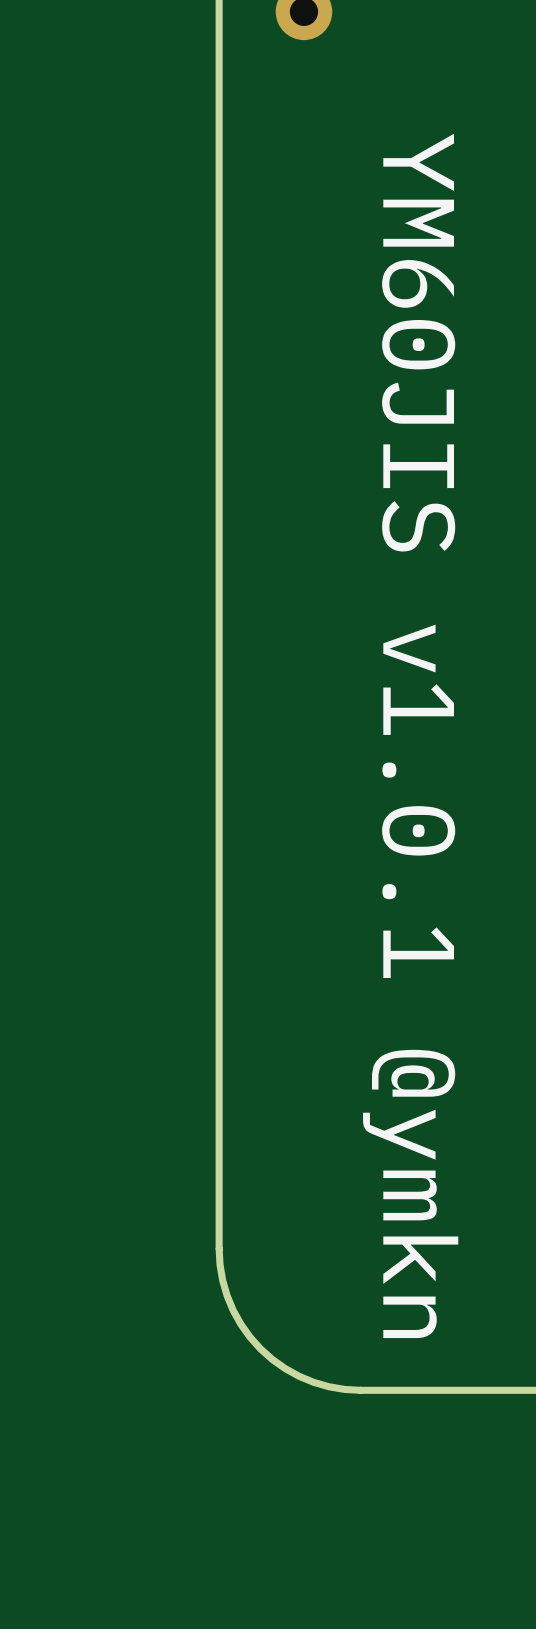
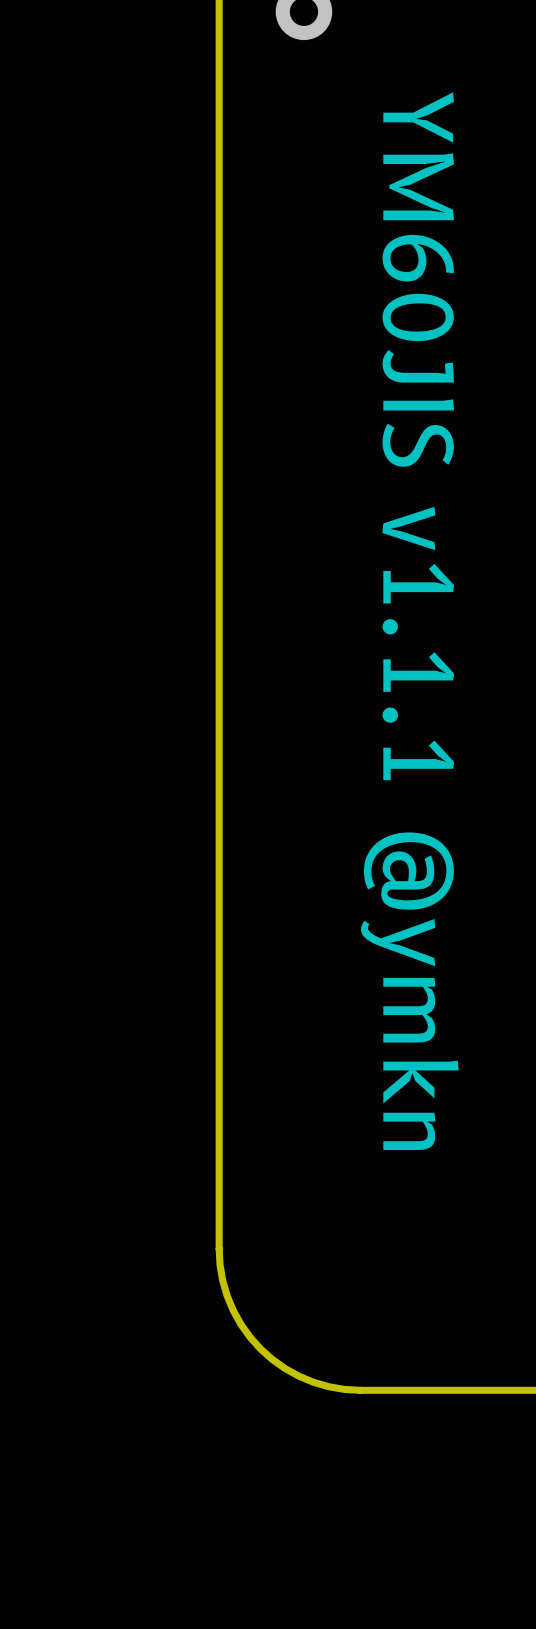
text: YM60JIS v1.0.1 @ymkn (410, 735) -> YM60JIS v1.1.1 @ymkn (409, 621)

